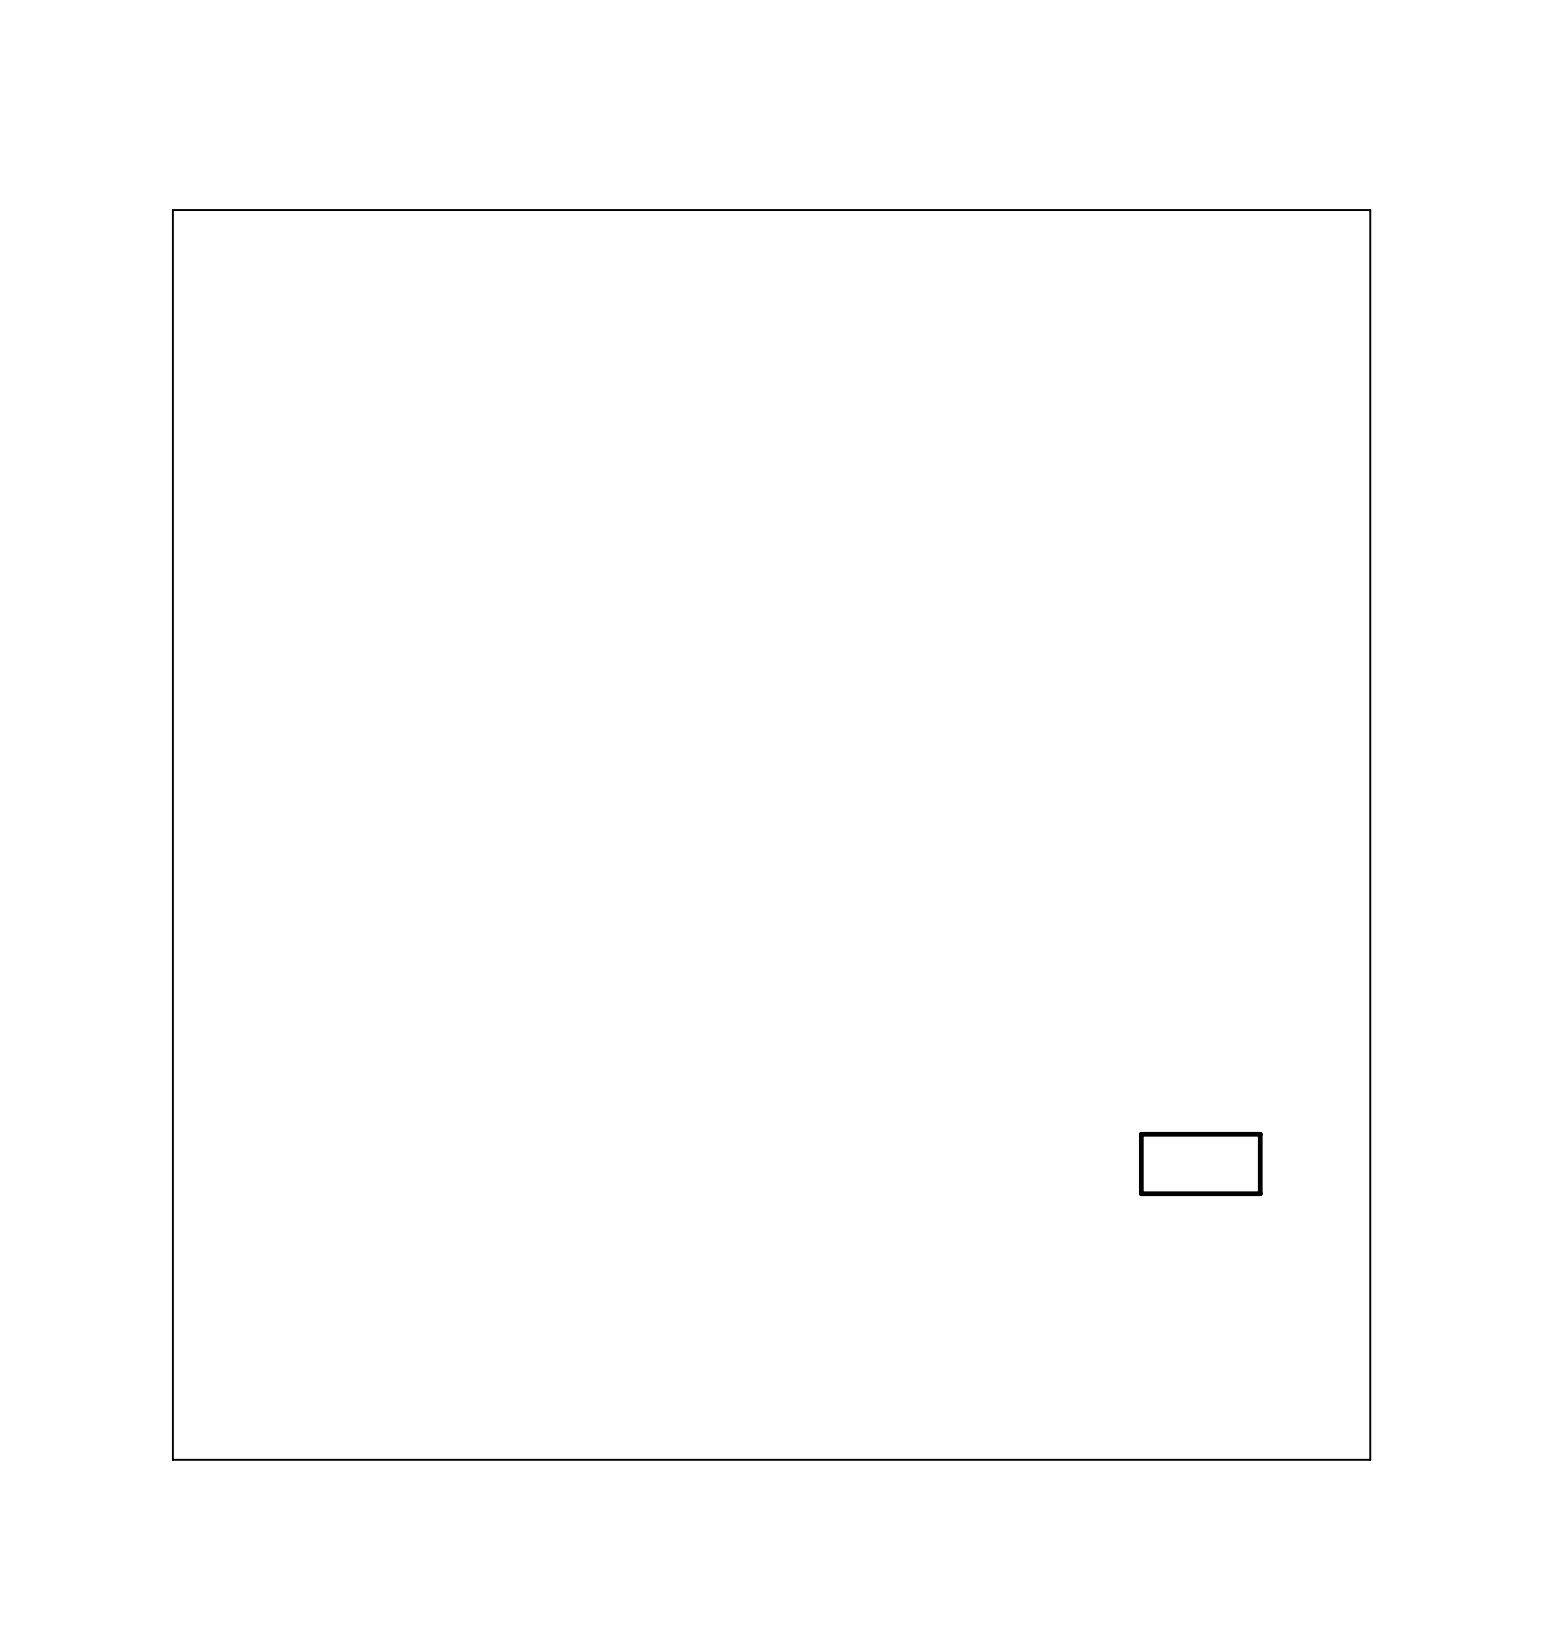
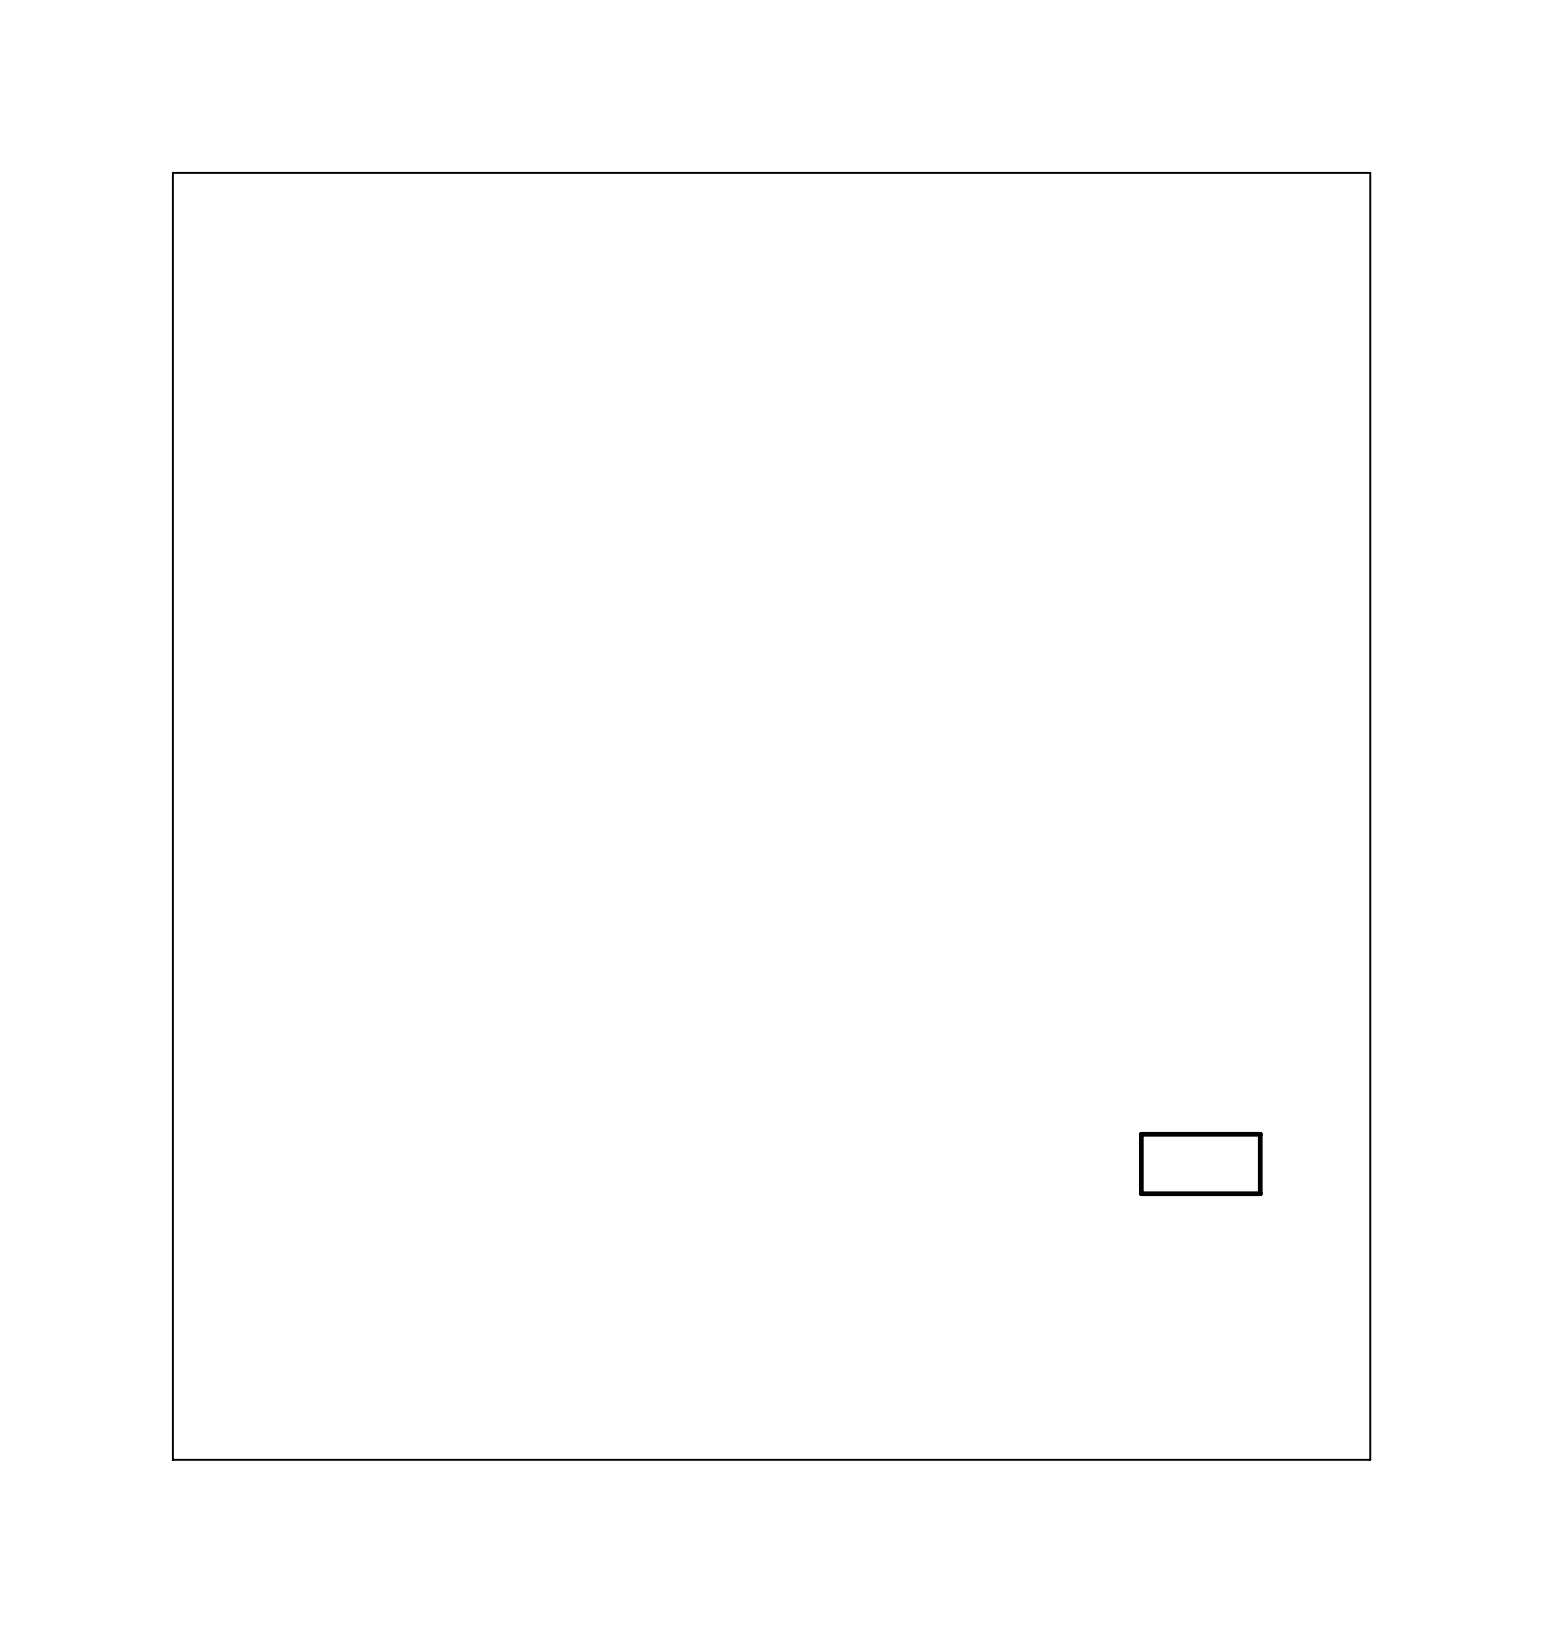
board edge: (1370, 210) (172, 210) -> (1370, 210) (1370, 172) (172, 172) (172, 210)

